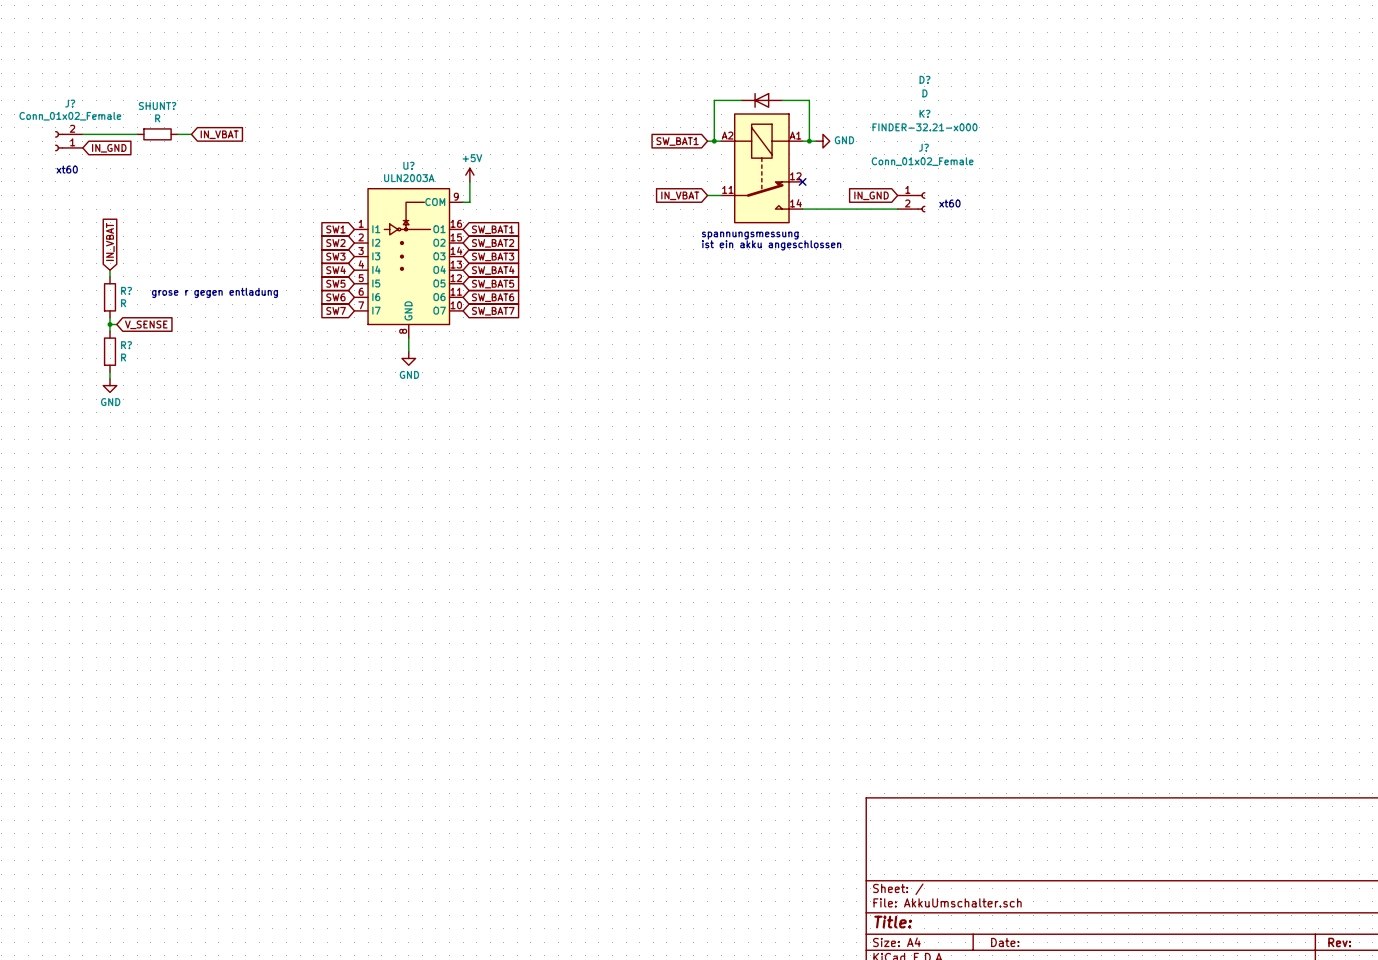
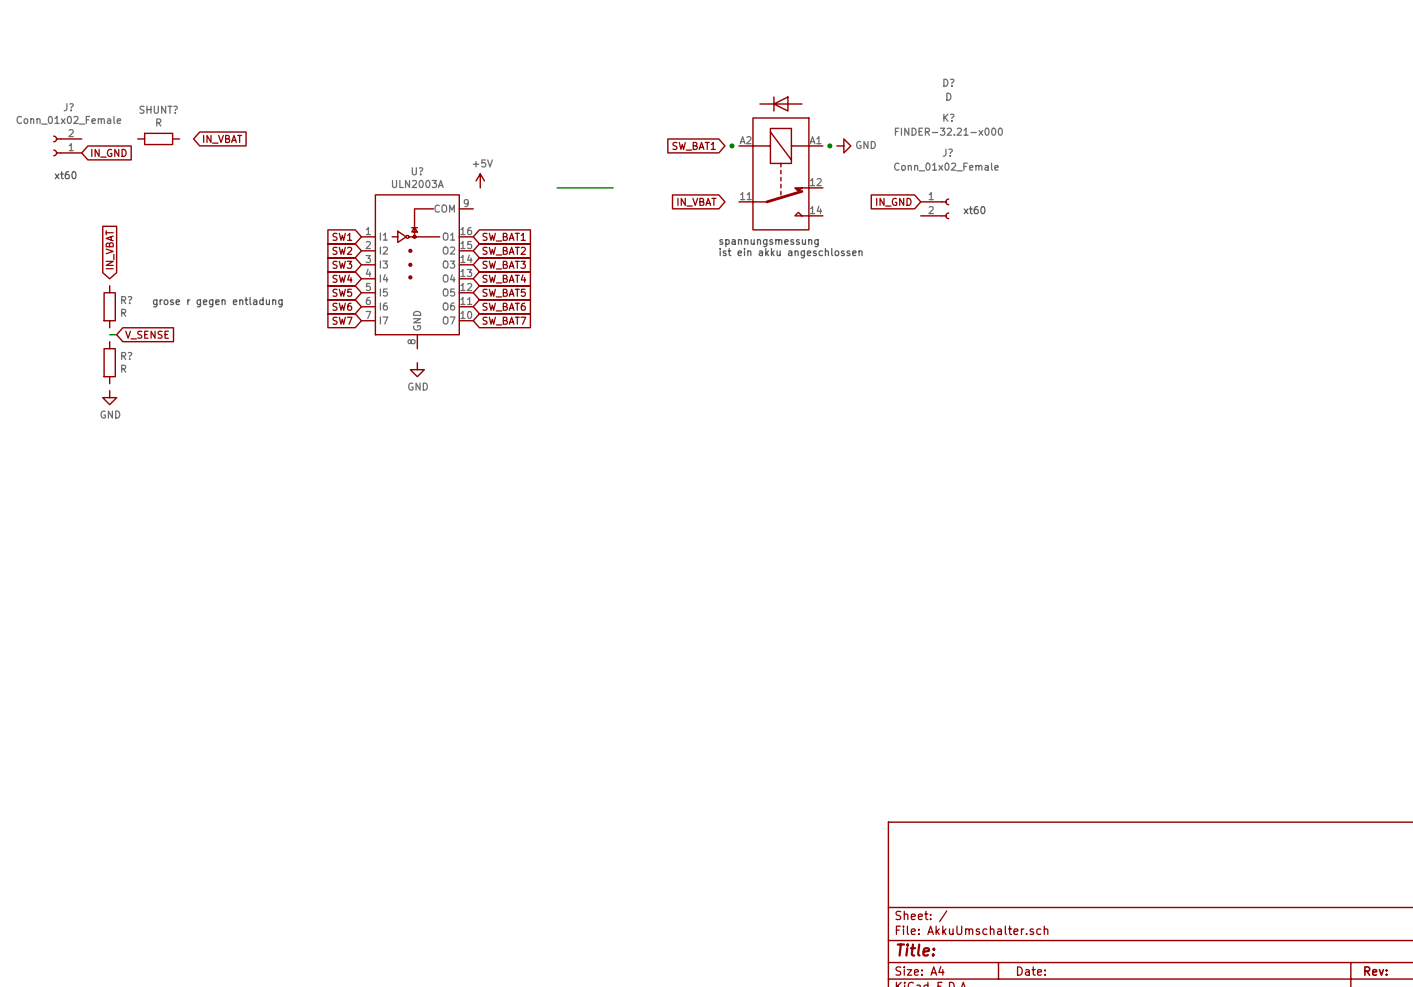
wire: (741, 100) (714, 100) (714, 141) -> none
wire: (782, 100) (809, 100) (809, 141) -> none
wire: (82, 134) (137, 134) -> none
wire: (177, 134) (191, 134) -> none
wire: (707, 141) (721, 141) -> none
wire: (802, 141) (816, 141) -> none
wire: (469, 181) (469, 202) (463, 202) -> none
wire: none -> (557, 187) (613, 187)
no-connect mark: (802, 181) -> none
wire: (707, 195) (721, 195) -> none
wire: (802, 209) (897, 209) -> none
wire: (110, 270) (110, 276) -> none
wire: (110, 317) (110, 331) -> none
junction: (110, 324) -> none
wire: (408, 338) (408, 351) -> none
wire: (110, 372) (110, 378) -> none

